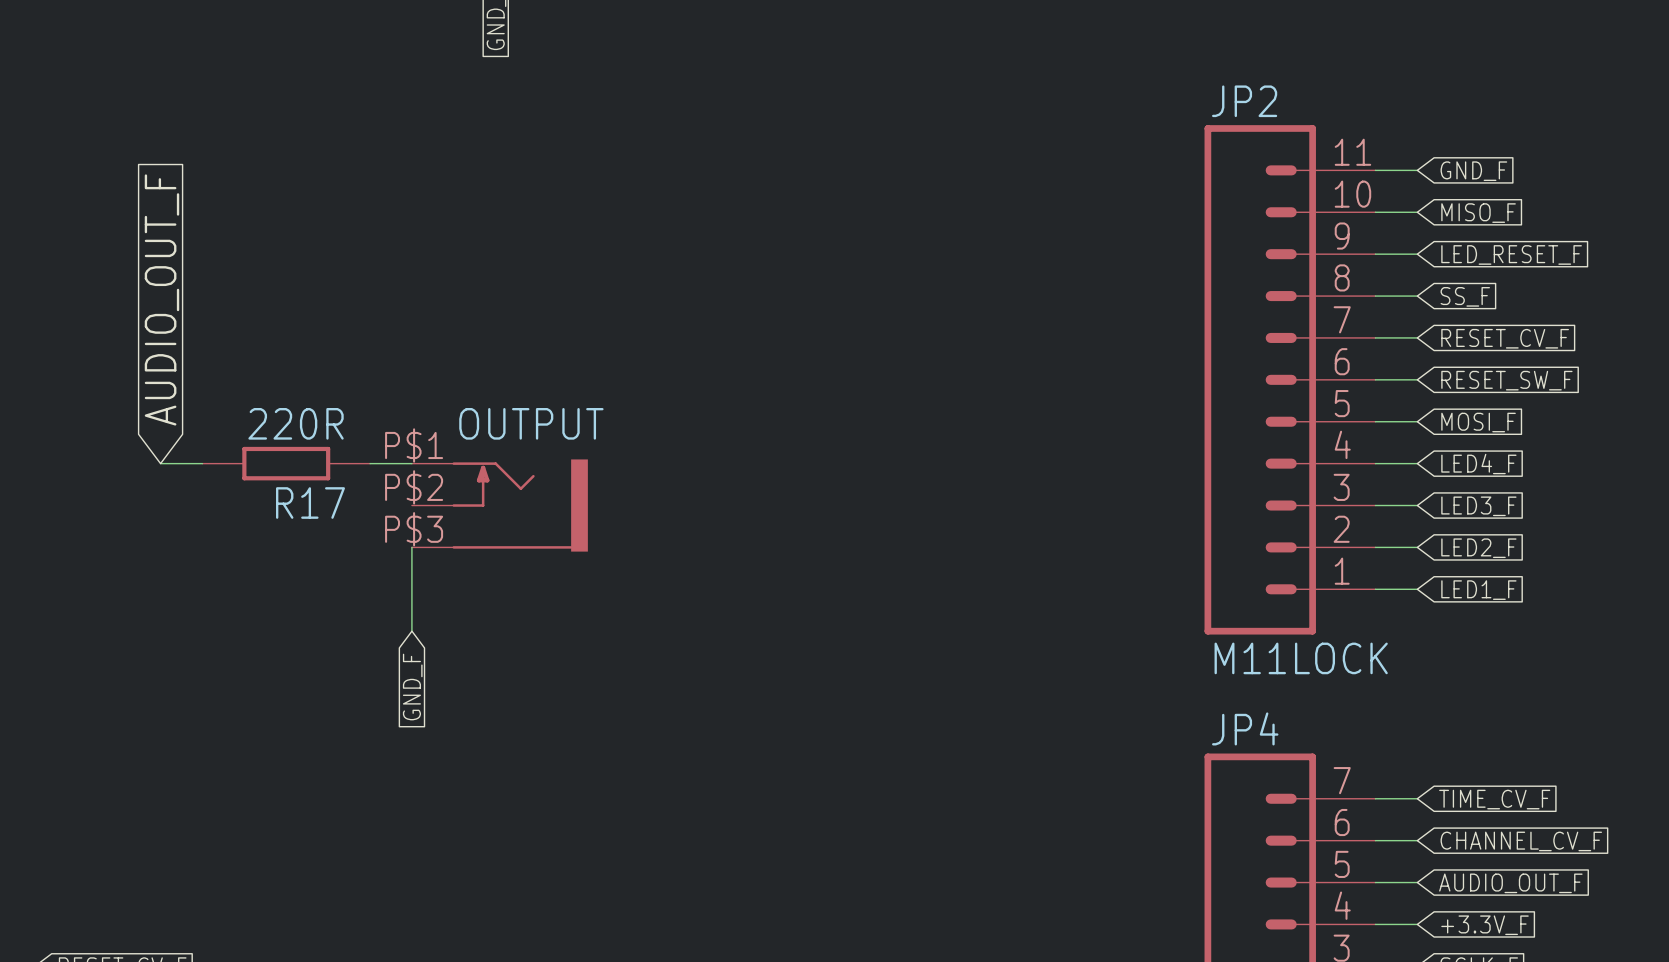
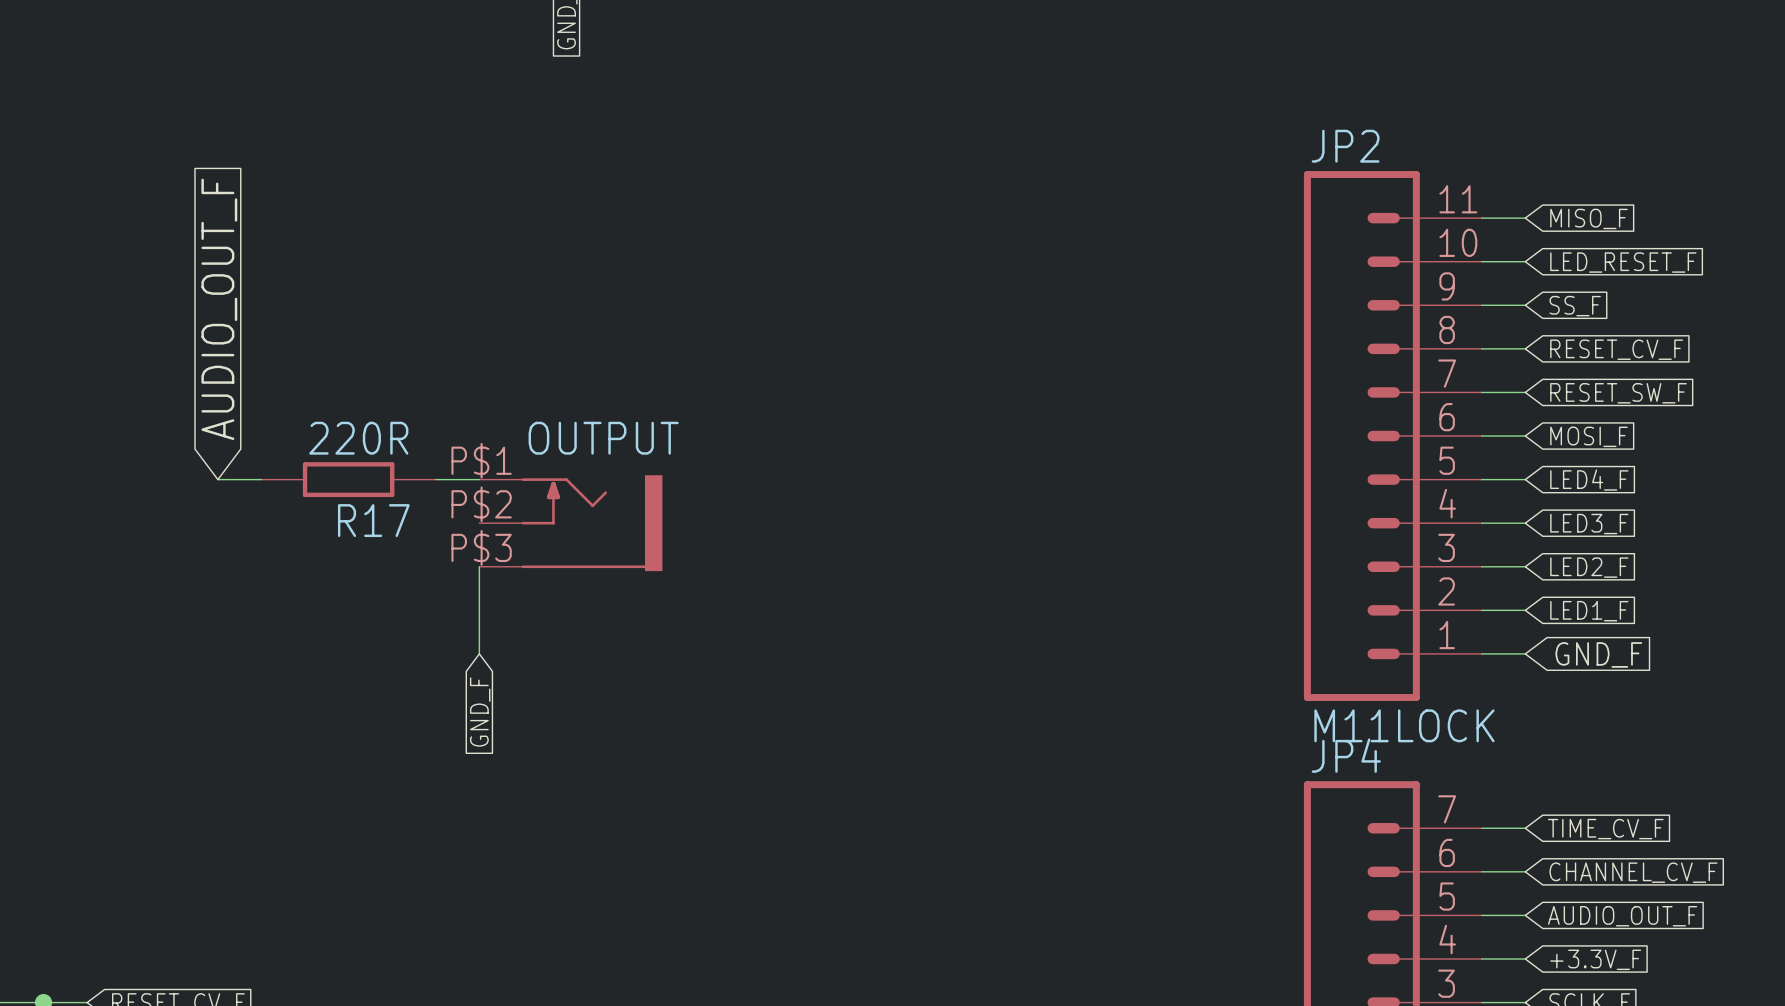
wire: (1375, 170) (1417, 170) -> none
global label: GND_F (1473, 171) -> none
JP2 position: (1289, 379) -> (1392, 436)
wire: none -> (1481, 653) (1525, 653)
global label: none -> GND_F (1598, 654)

